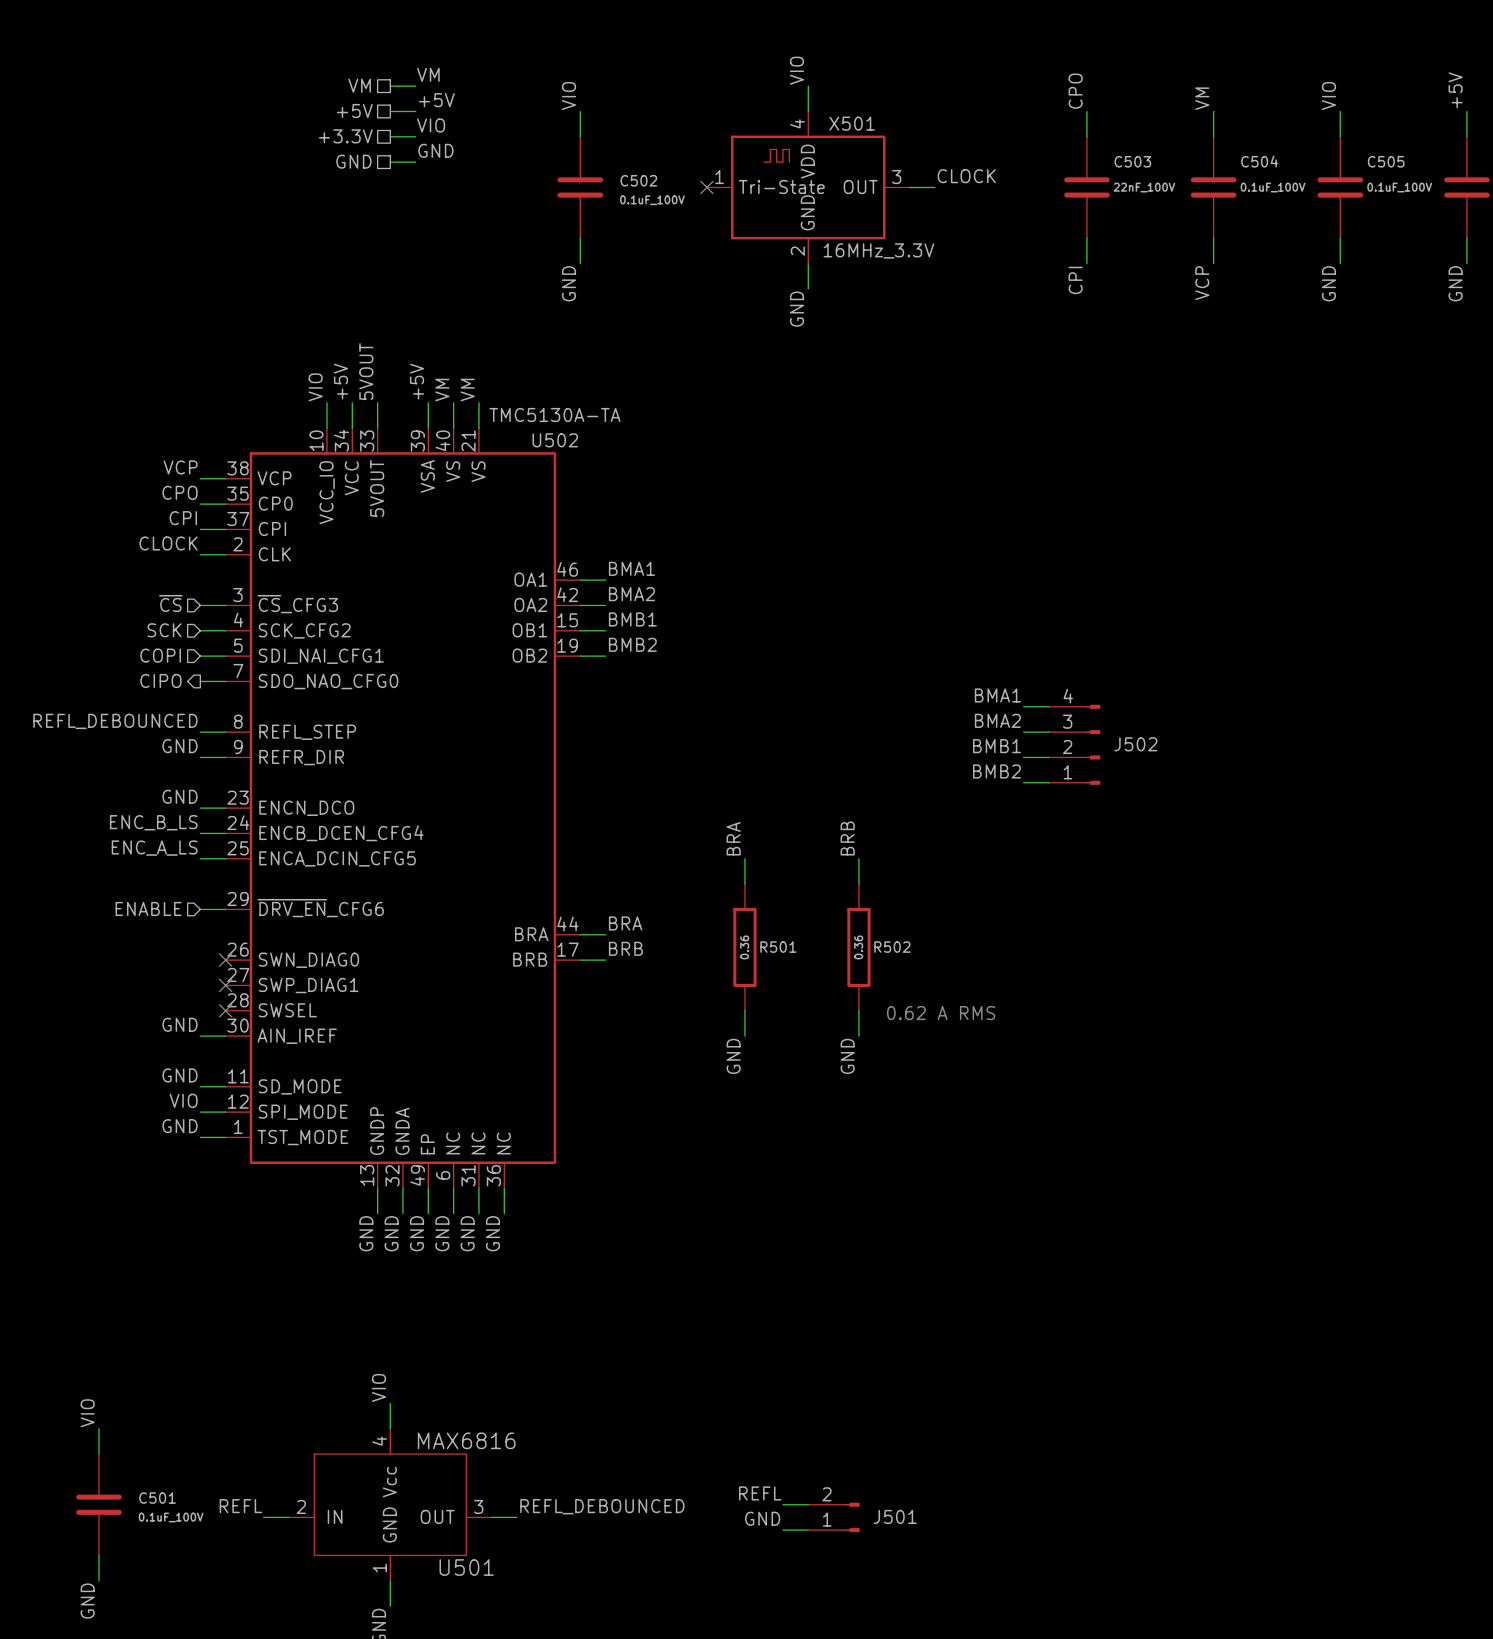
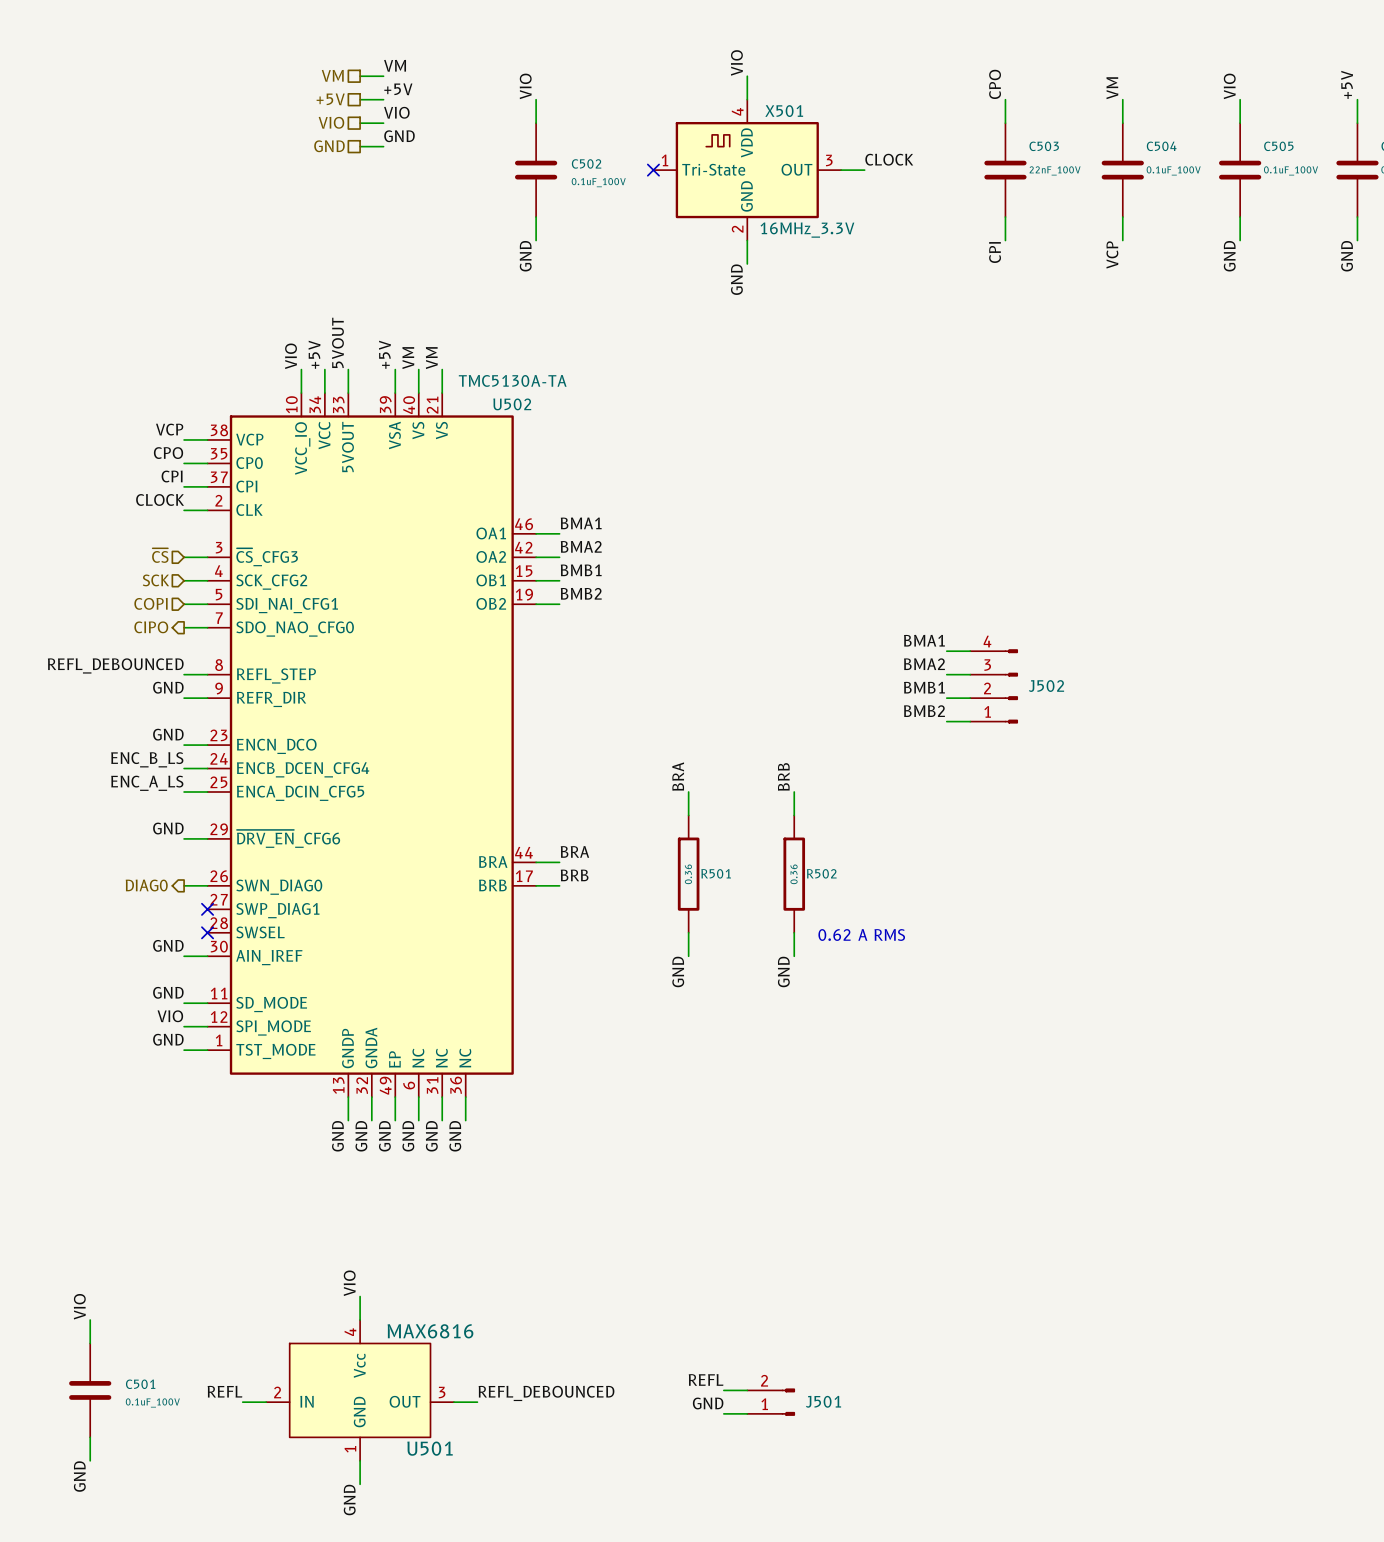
hierarchical label: +3.3V (345, 136) -> VIO (331, 122)
label: none -> GND (168, 828)
hierarchical label: ENABLE (148, 908) -> none
hierarchical label: none -> DIAG0 (146, 885)
wire: none -> (184, 885) (207, 885)
no-connect mark: (225, 960) -> none

